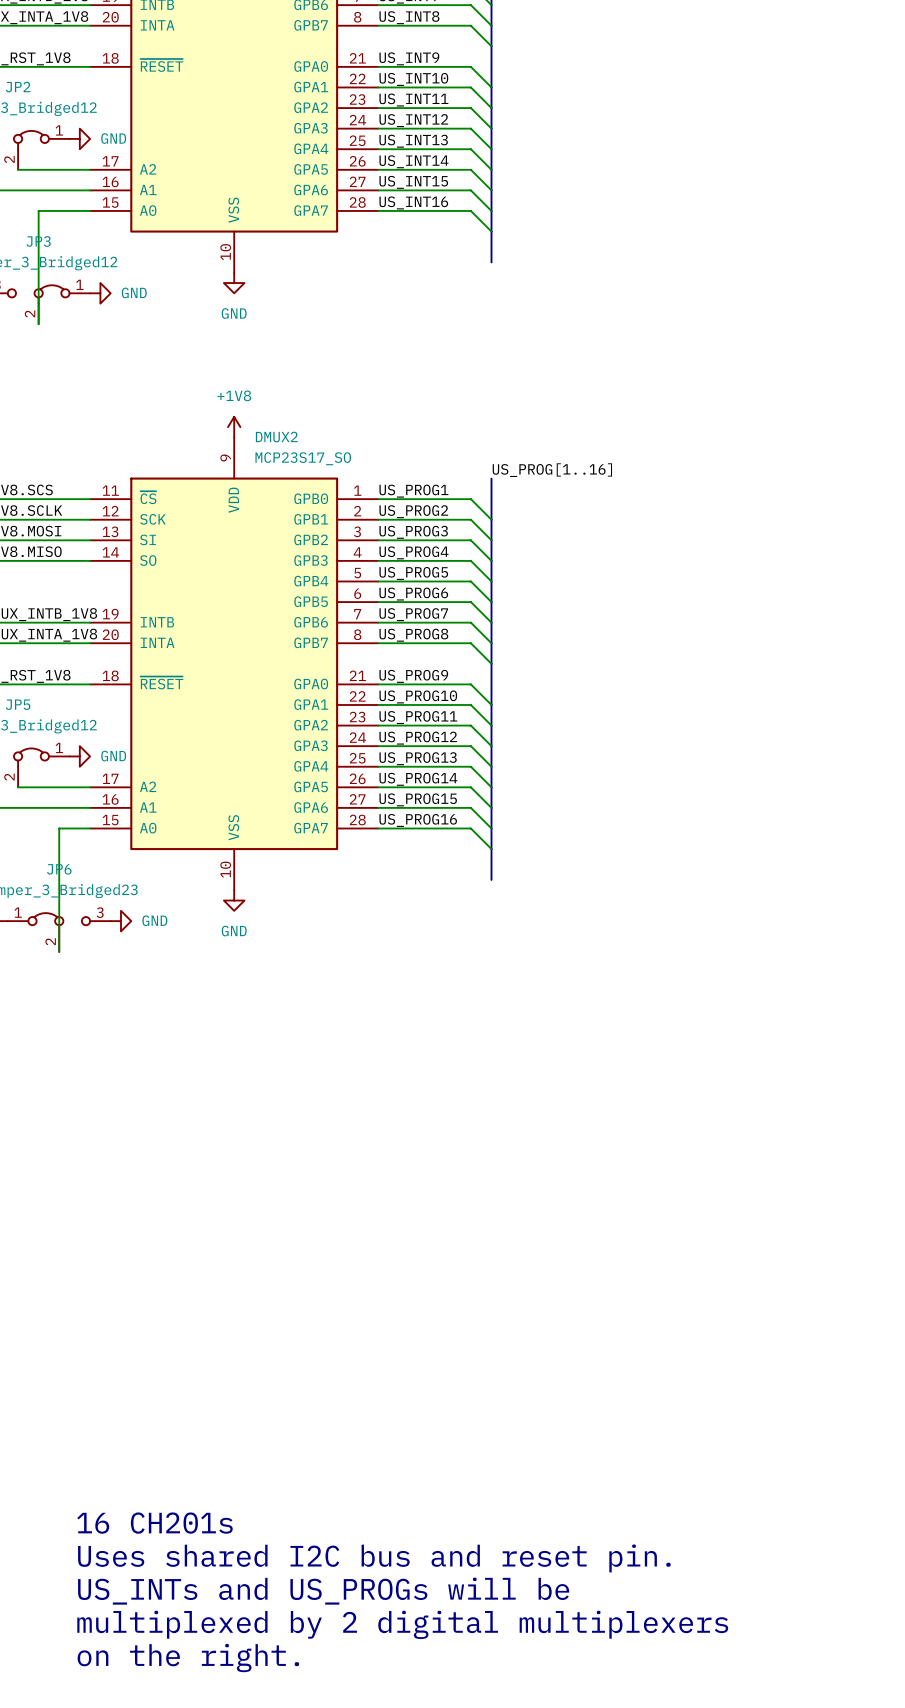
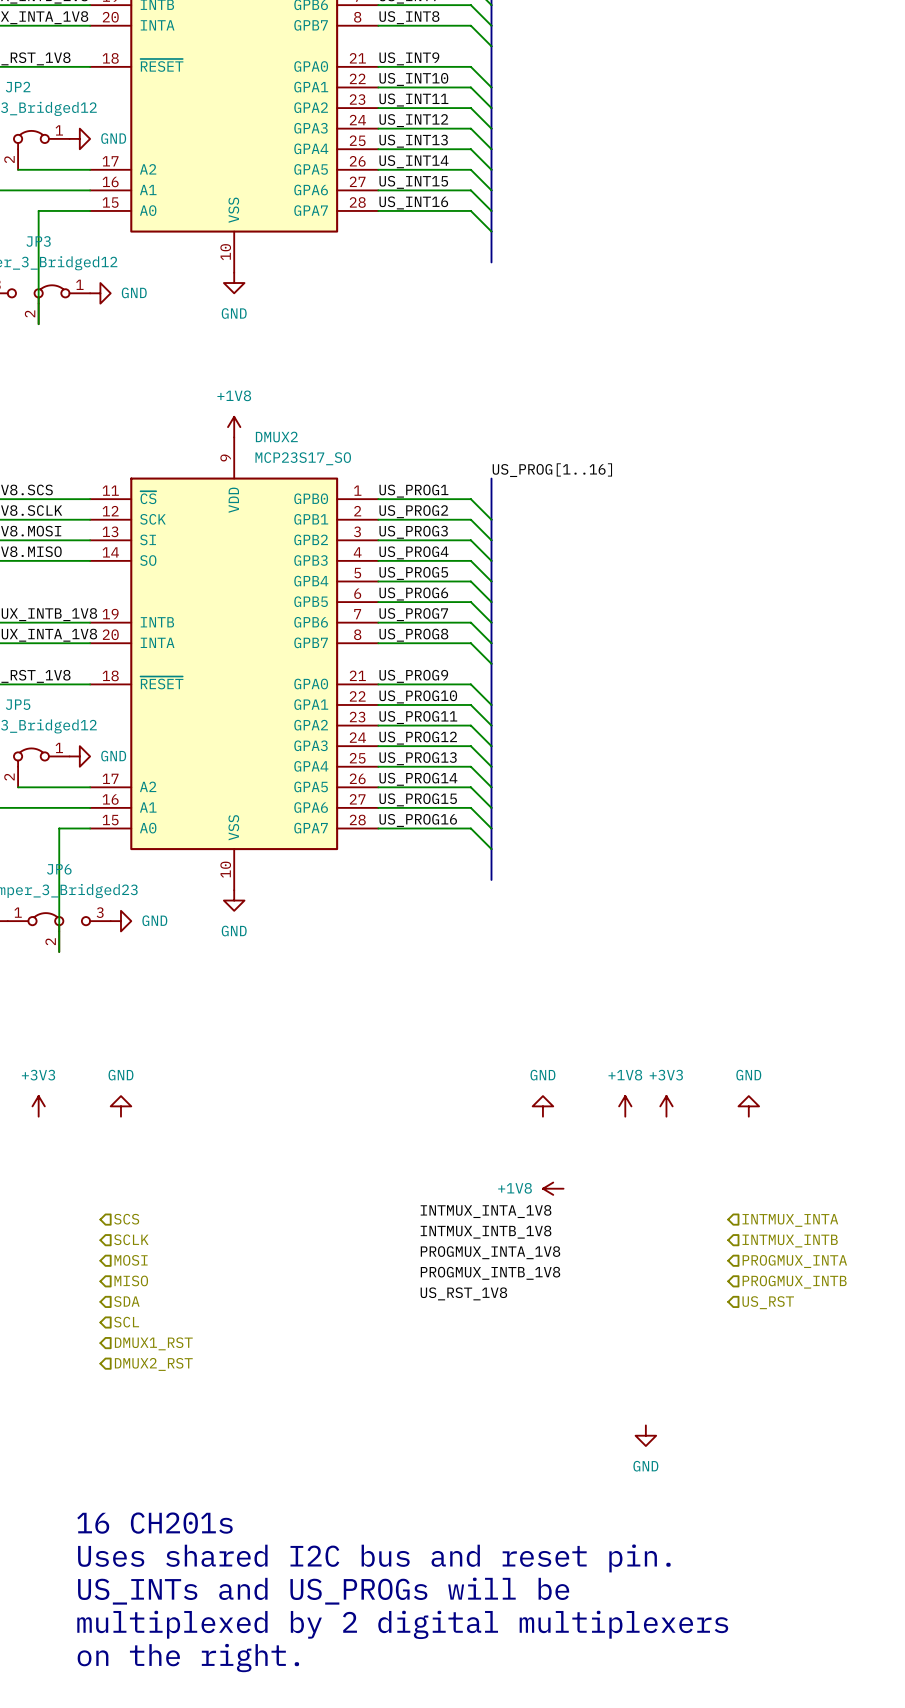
power symbol: none -> +3V3 (38, 1106)
power symbol: none -> GND (120, 1106)
power symbol: none -> GND (542, 1106)
power symbol: none -> +1V8 (625, 1106)
power symbol: none -> +3V3 (666, 1106)
power symbol: none -> GND (748, 1106)
power symbol: none -> +1V8 (553, 1188)
label: none -> INTMUX_INTA_1V8 (486, 1211)
hierarchical label: none -> SCS (126, 1219)
hierarchical label: none -> INTMUX_INTA (790, 1220)
label: none -> INTMUX_INTB_1V8 (486, 1232)
hierarchical label: none -> SCLK (131, 1239)
hierarchical label: none -> INTMUX_INTB (790, 1241)
label: none -> PROGMUX_INTA_1V8 (490, 1252)
hierarchical label: none -> MOSI (131, 1260)
hierarchical label: none -> PROGMUX_INTA (794, 1261)
label: none -> PROGMUX_INTB_1V8 (490, 1273)
hierarchical label: none -> MISO (131, 1280)
hierarchical label: none -> PROGMUX_INTB (794, 1282)
label: none -> US_RST_1V8 (463, 1293)
hierarchical label: none -> SDA (126, 1301)
hierarchical label: none -> US_RST (768, 1302)
hierarchical label: none -> SCL (126, 1322)
hierarchical label: none -> DMUX1_RST (153, 1343)
hierarchical label: none -> DMUX2_RST (153, 1364)
power symbol: none -> GND (645, 1435)

